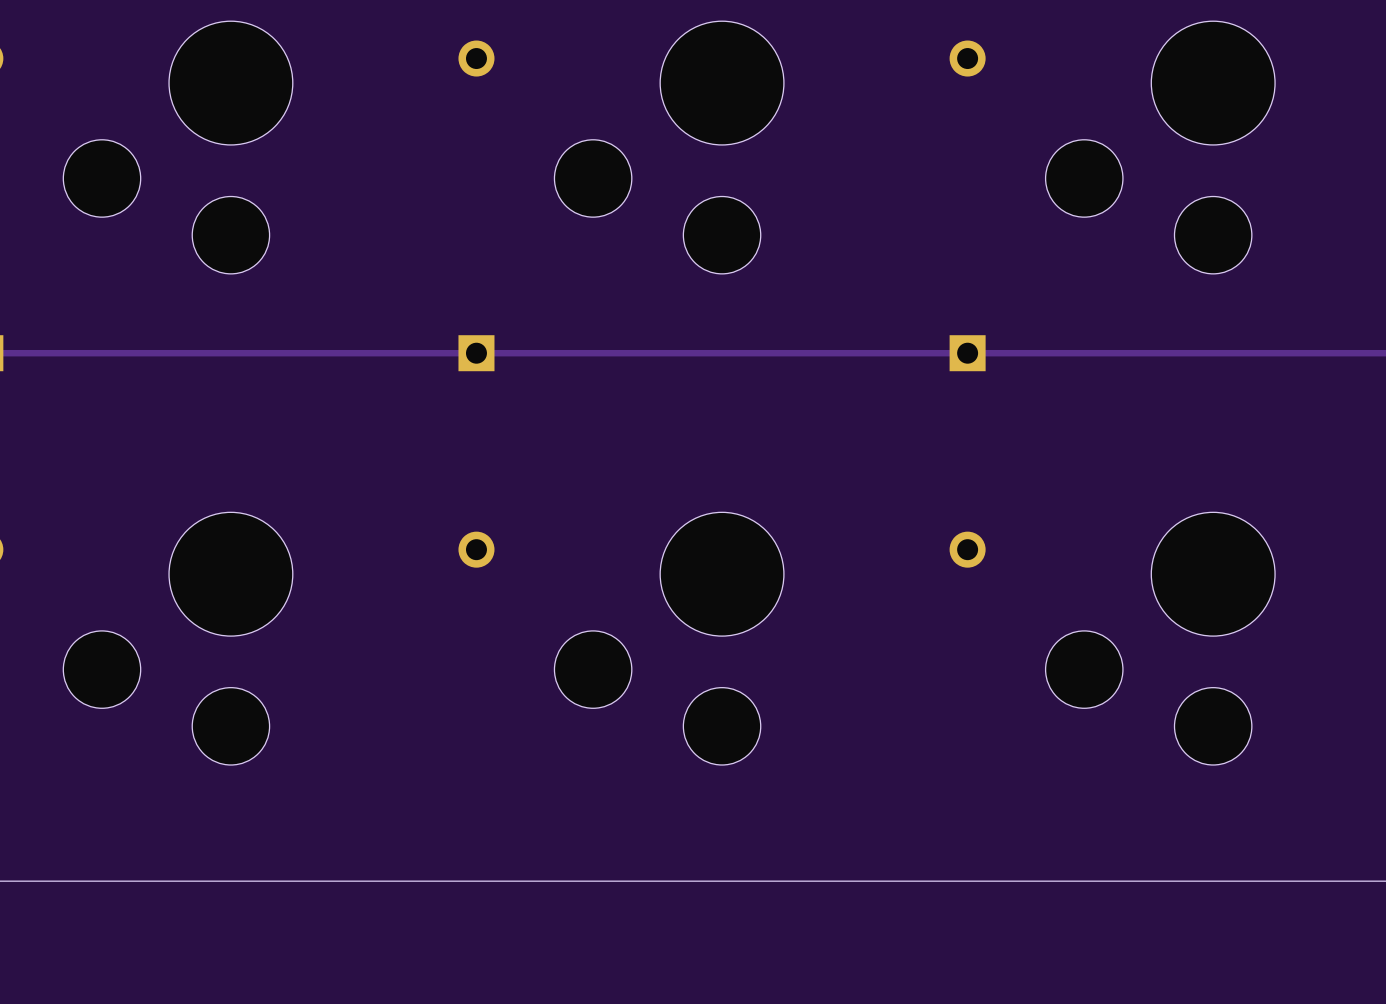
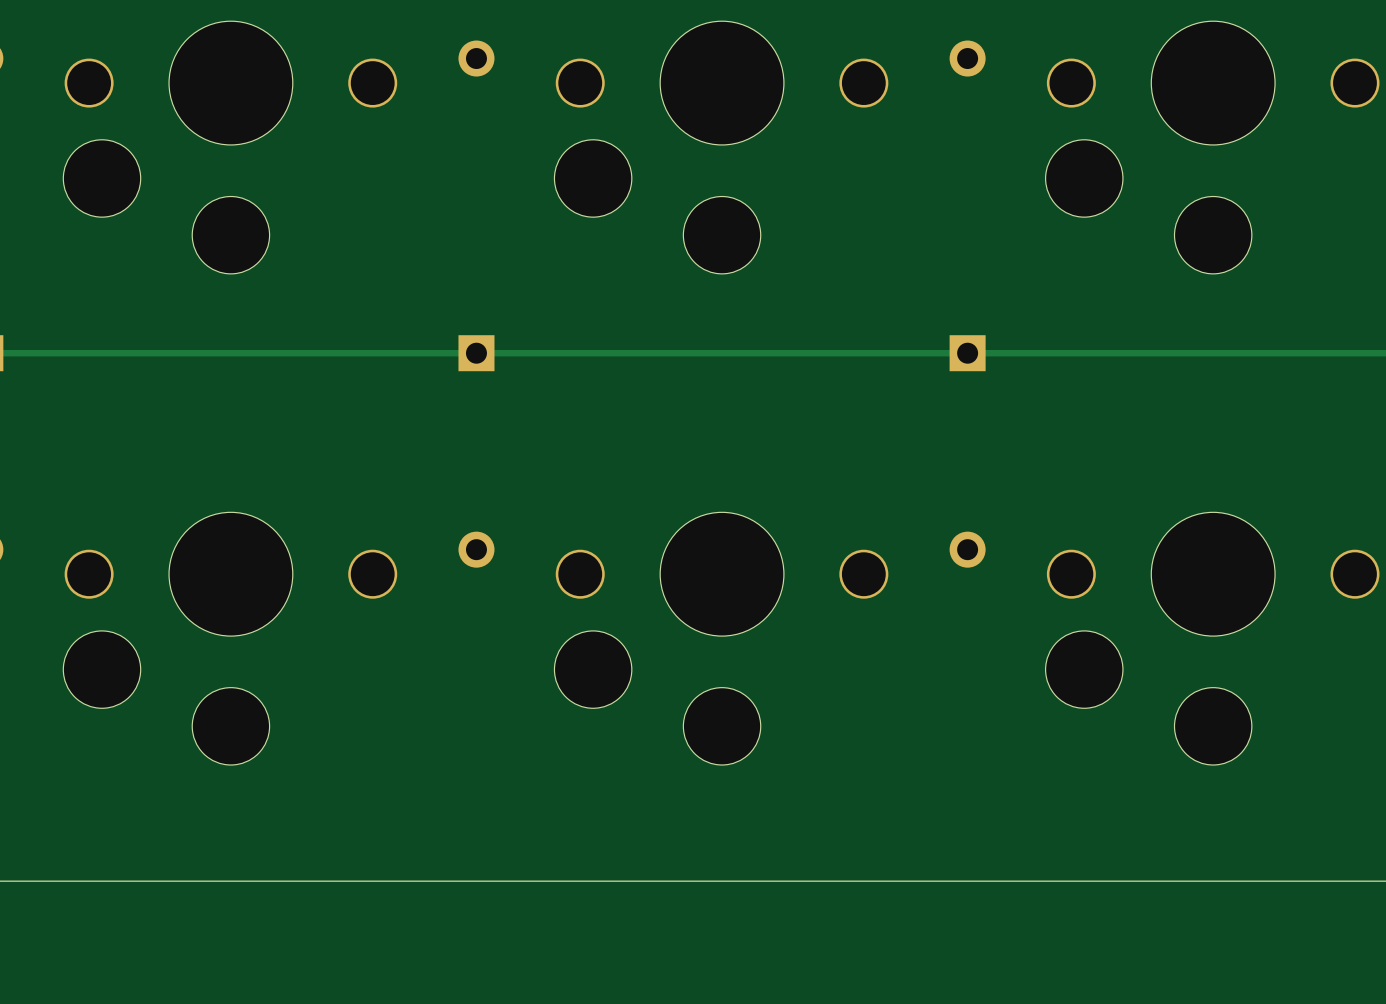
part: none -> (230, 147)
part: none -> (721, 147)
part: none -> (1212, 147)
part: none -> (230, 638)
part: none -> (721, 638)
part: none -> (1212, 638)

